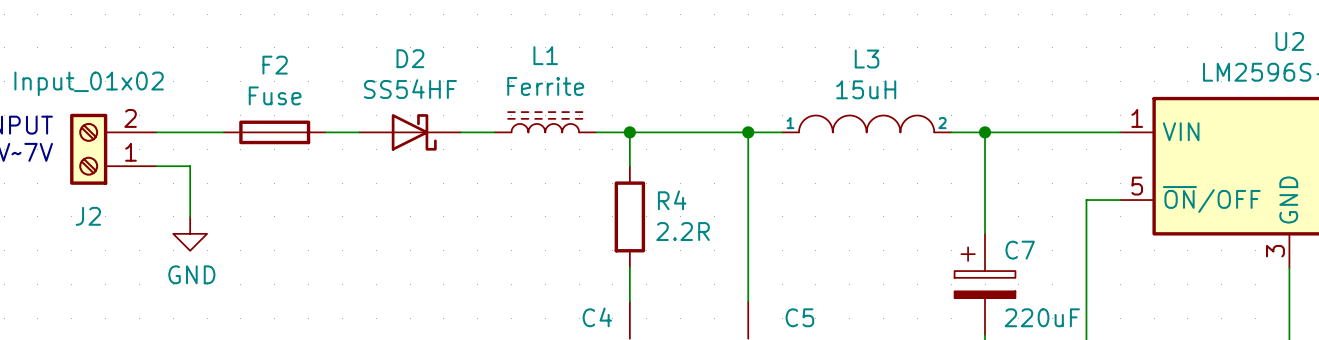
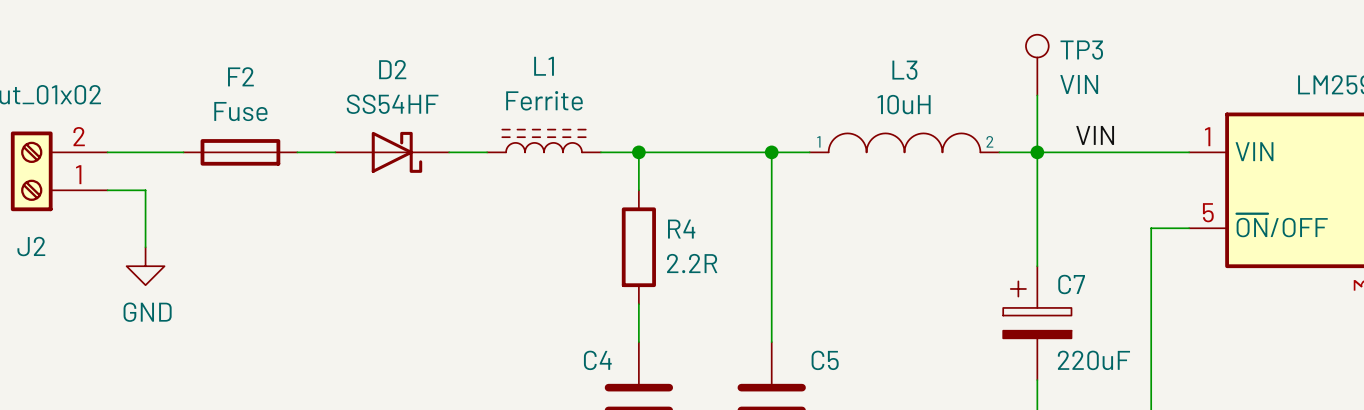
TP3: none -> VIN (1037, 65)
wire: none -> (1037, 95) (1037, 152)
L3 value: 15uH (866, 89) -> 10uH (904, 104)
label: none -> VIN (1095, 135)

